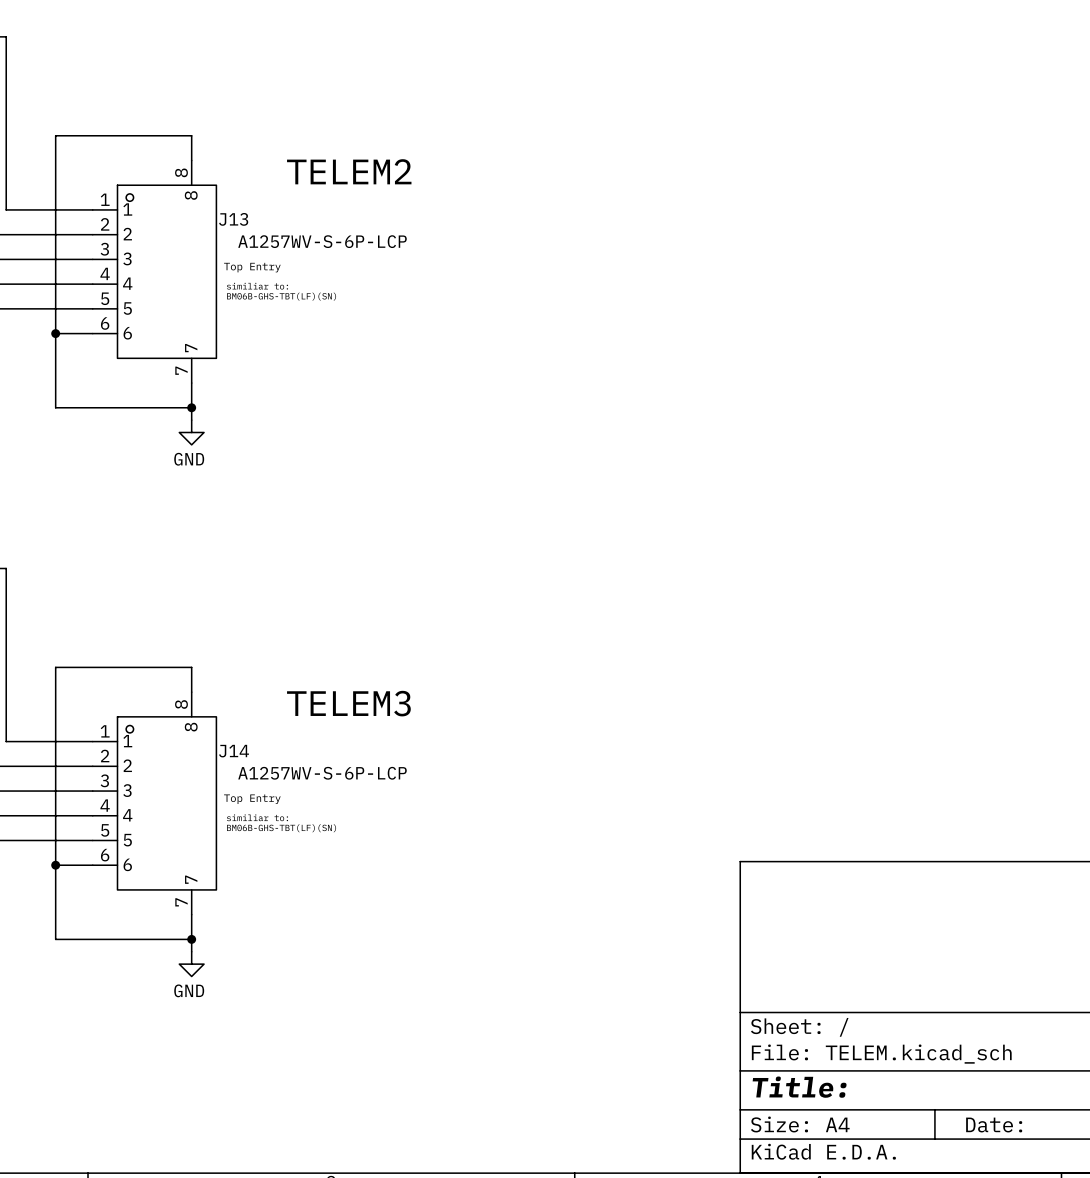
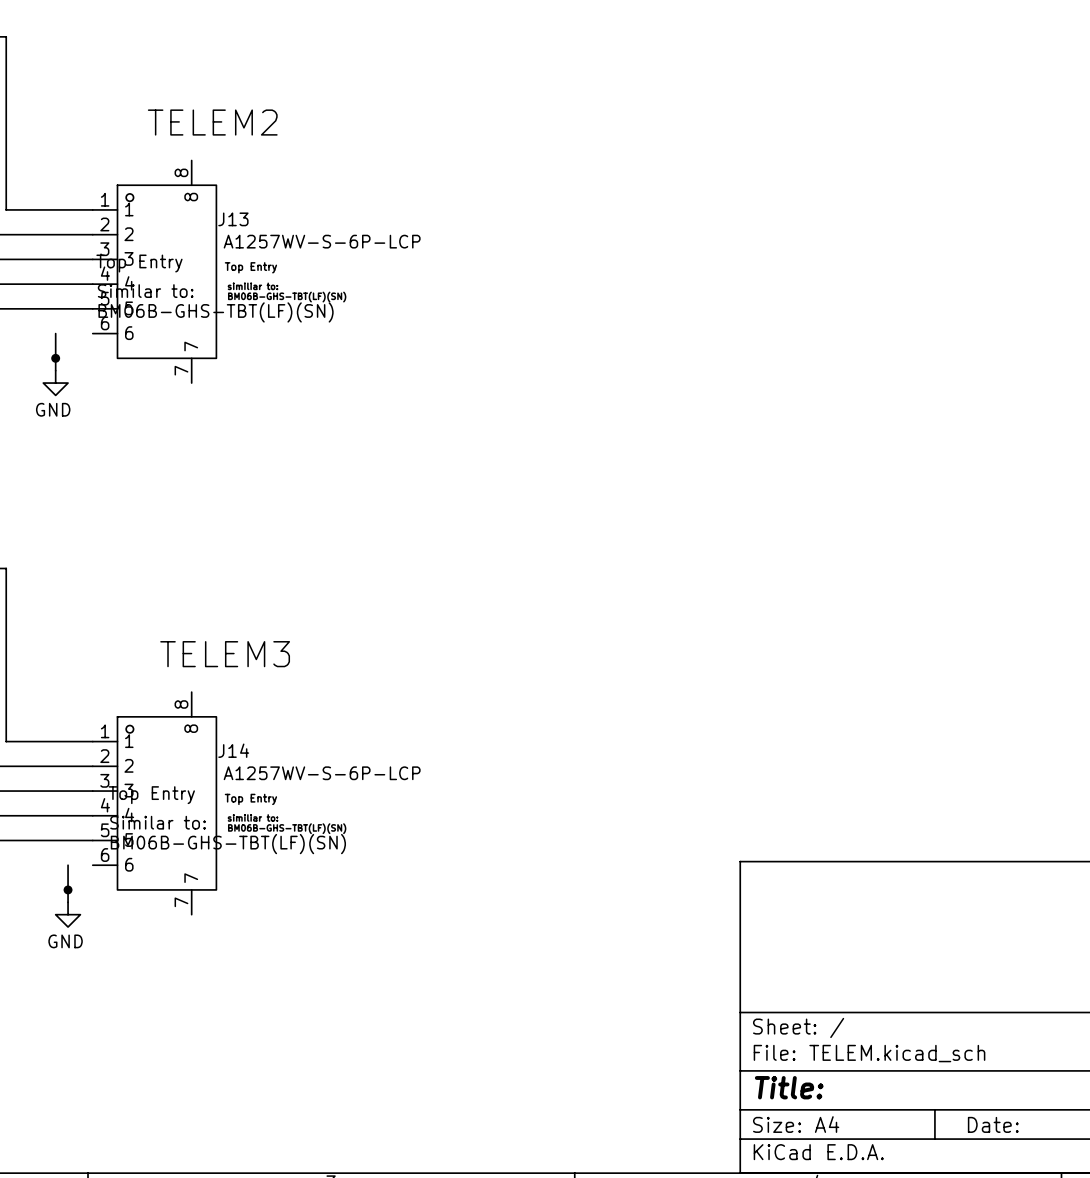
wire: (191, 160) (191, 135) (55, 135) (55, 333) (92, 333) -> none
text position: TELEM2 (349, 171) -> TELEM2 (212, 122)
text: none -> Top Entry (139, 263)
text: none -> Similar to: (145, 291)
text: none -> BM06B-GHS-TBT(LF)(SN) (216, 312)
junction position: (55, 333) -> (55, 358)
wire: (55, 370) (55, 407) (191, 407) -> none
power symbol: none -> GND (55, 383)
wire: (191, 383) (191, 420) -> none
junction: (191, 407) -> none
power symbol: GND (191, 432) -> none
wire: (191, 692) (191, 667) (55, 667) (55, 939) (191, 939) -> none
text position: TELEM3 (348, 703) -> TELEM3 (225, 654)
text: none -> Top Entry (151, 795)
text: none -> Similar to: (158, 822)
text: none -> BM06B-GHS-TBT(LF)(SN) (228, 844)
wire: (55, 865) (92, 865) -> none
junction position: (55, 865) -> (68, 889)
power symbol: none -> GND (68, 914)
wire: (191, 914) (191, 951) -> (68, 865) (68, 902)
junction: (191, 939) -> none
power symbol: GND (191, 964) -> none

